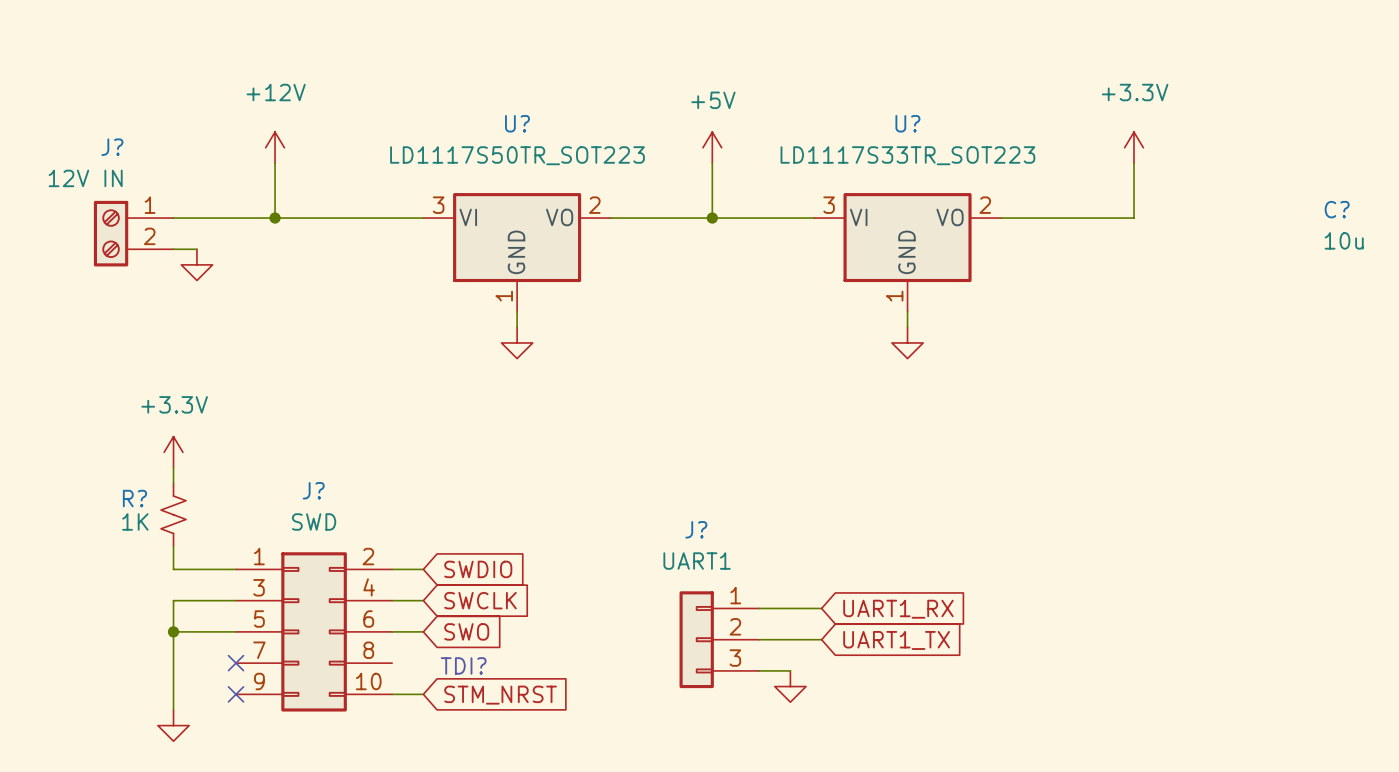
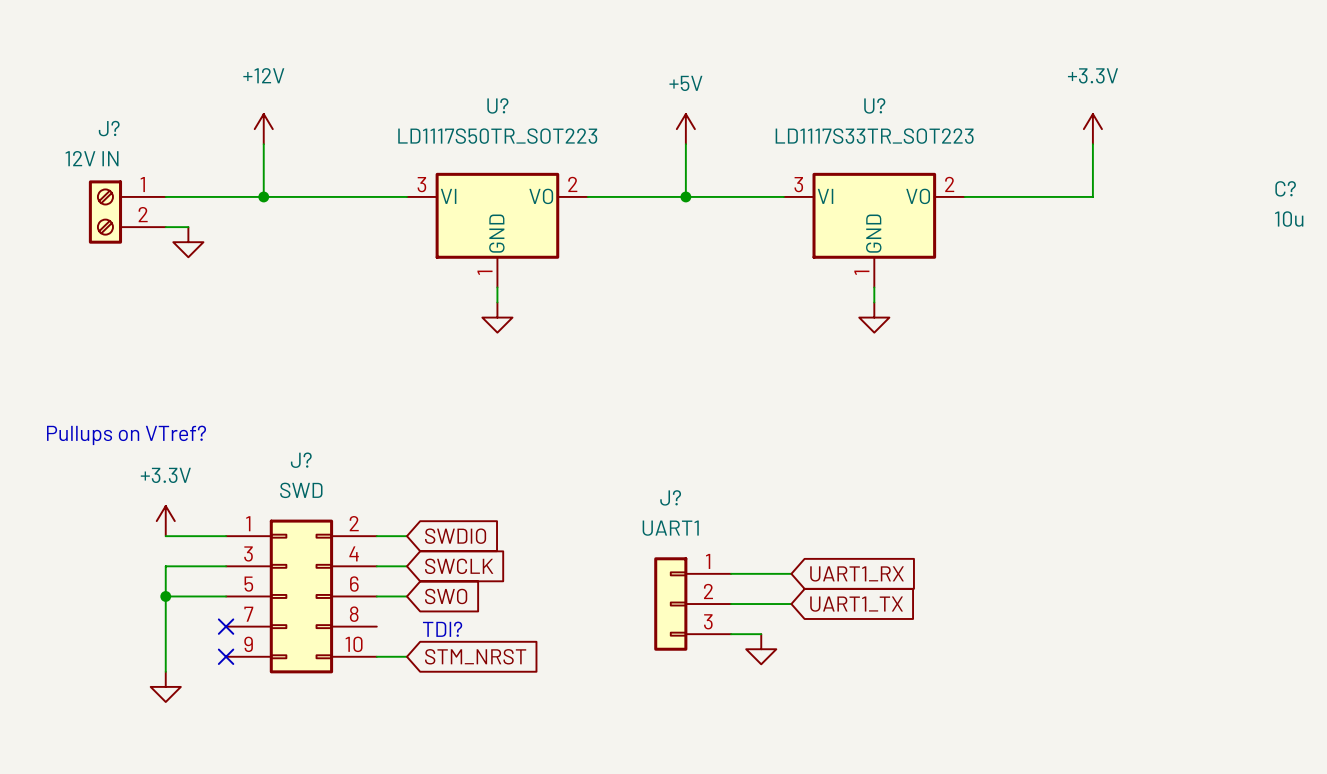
power symbol position: +3.3V (173, 452) -> +3.3V (165, 521)
text: none -> Pullups on VTref? (126, 435)
wire: (173, 467) (173, 483) -> none
R?: 1K (173, 514) -> none

